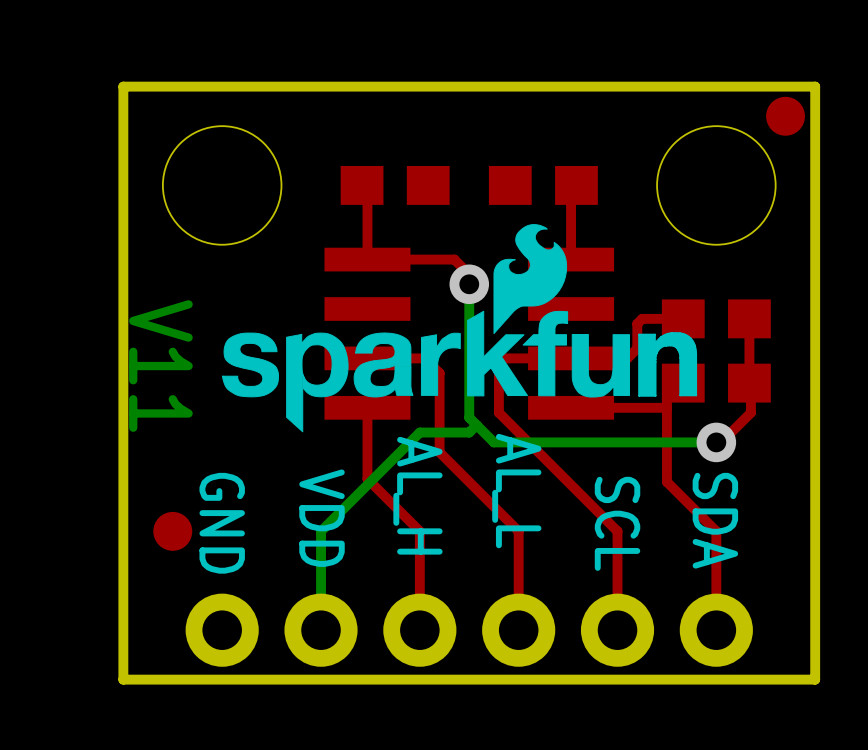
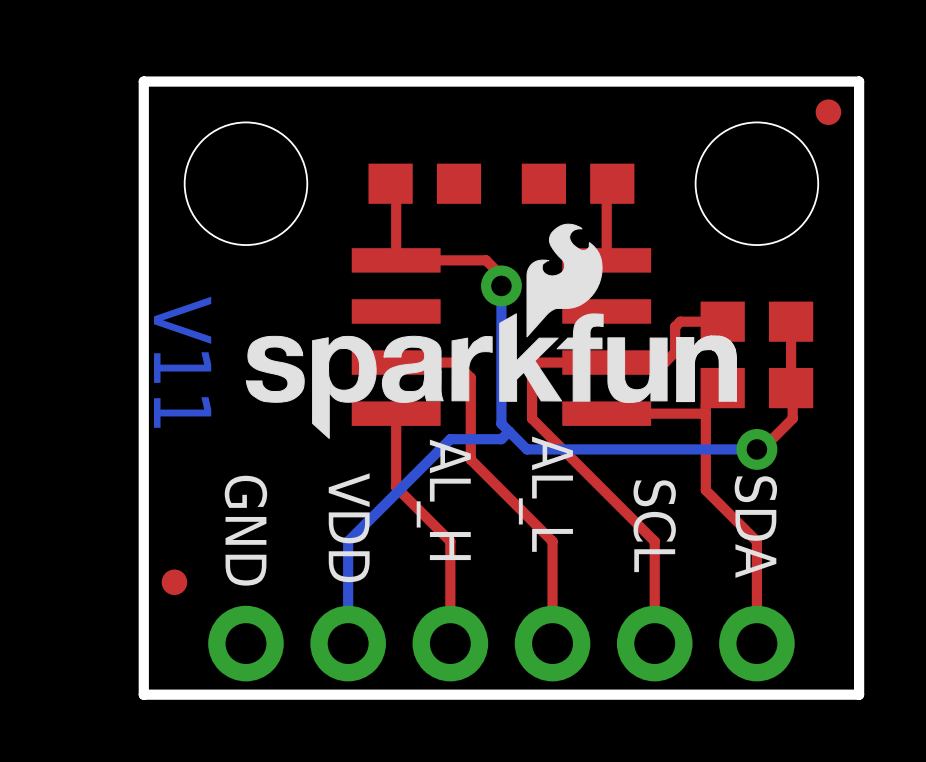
part footprint: [766, 96, 805, 136] -> [815, 99, 842, 125]
part: (172, 531) -> none
part: none -> (174, 582)

